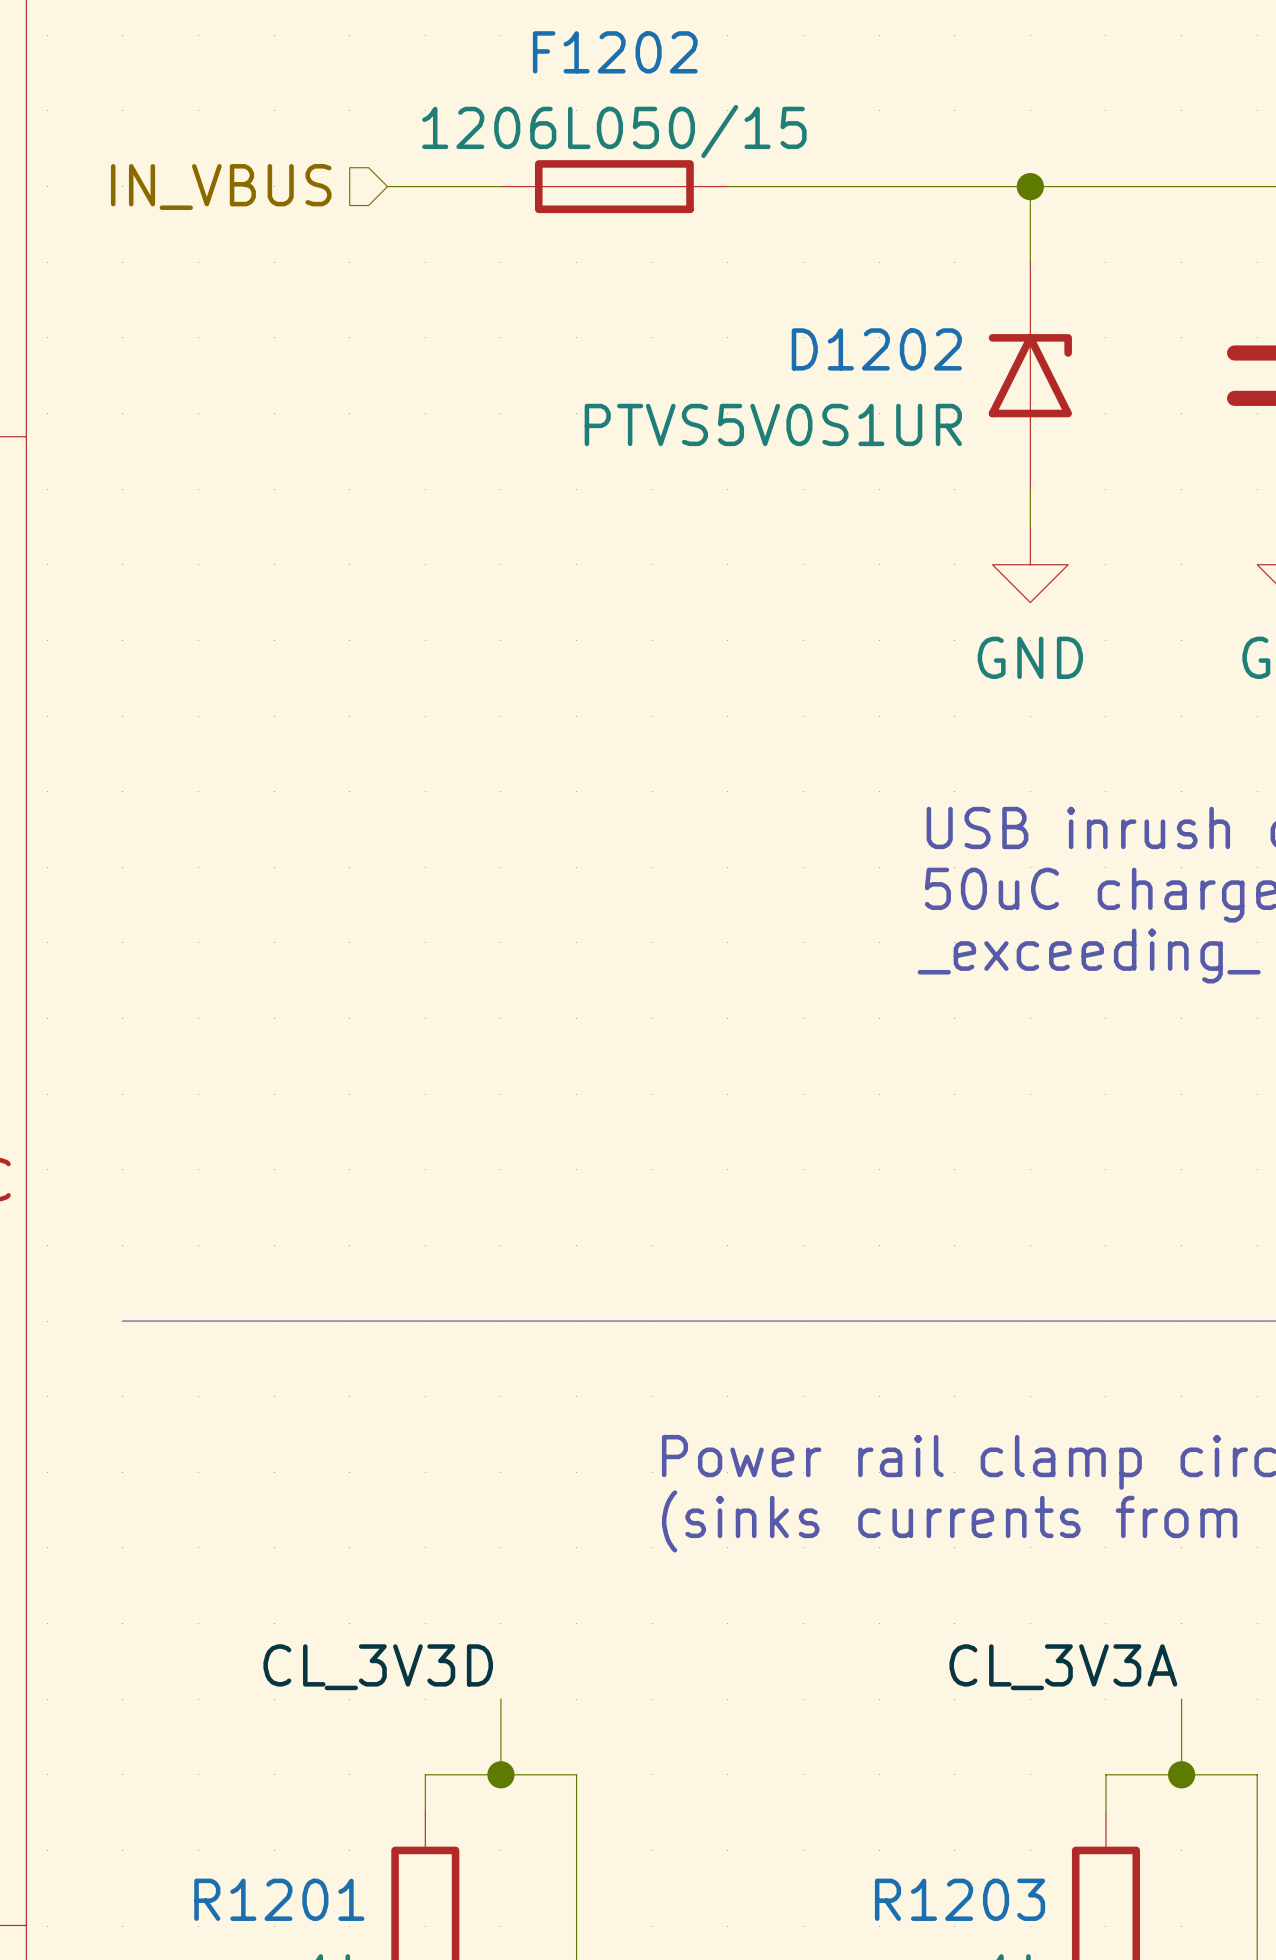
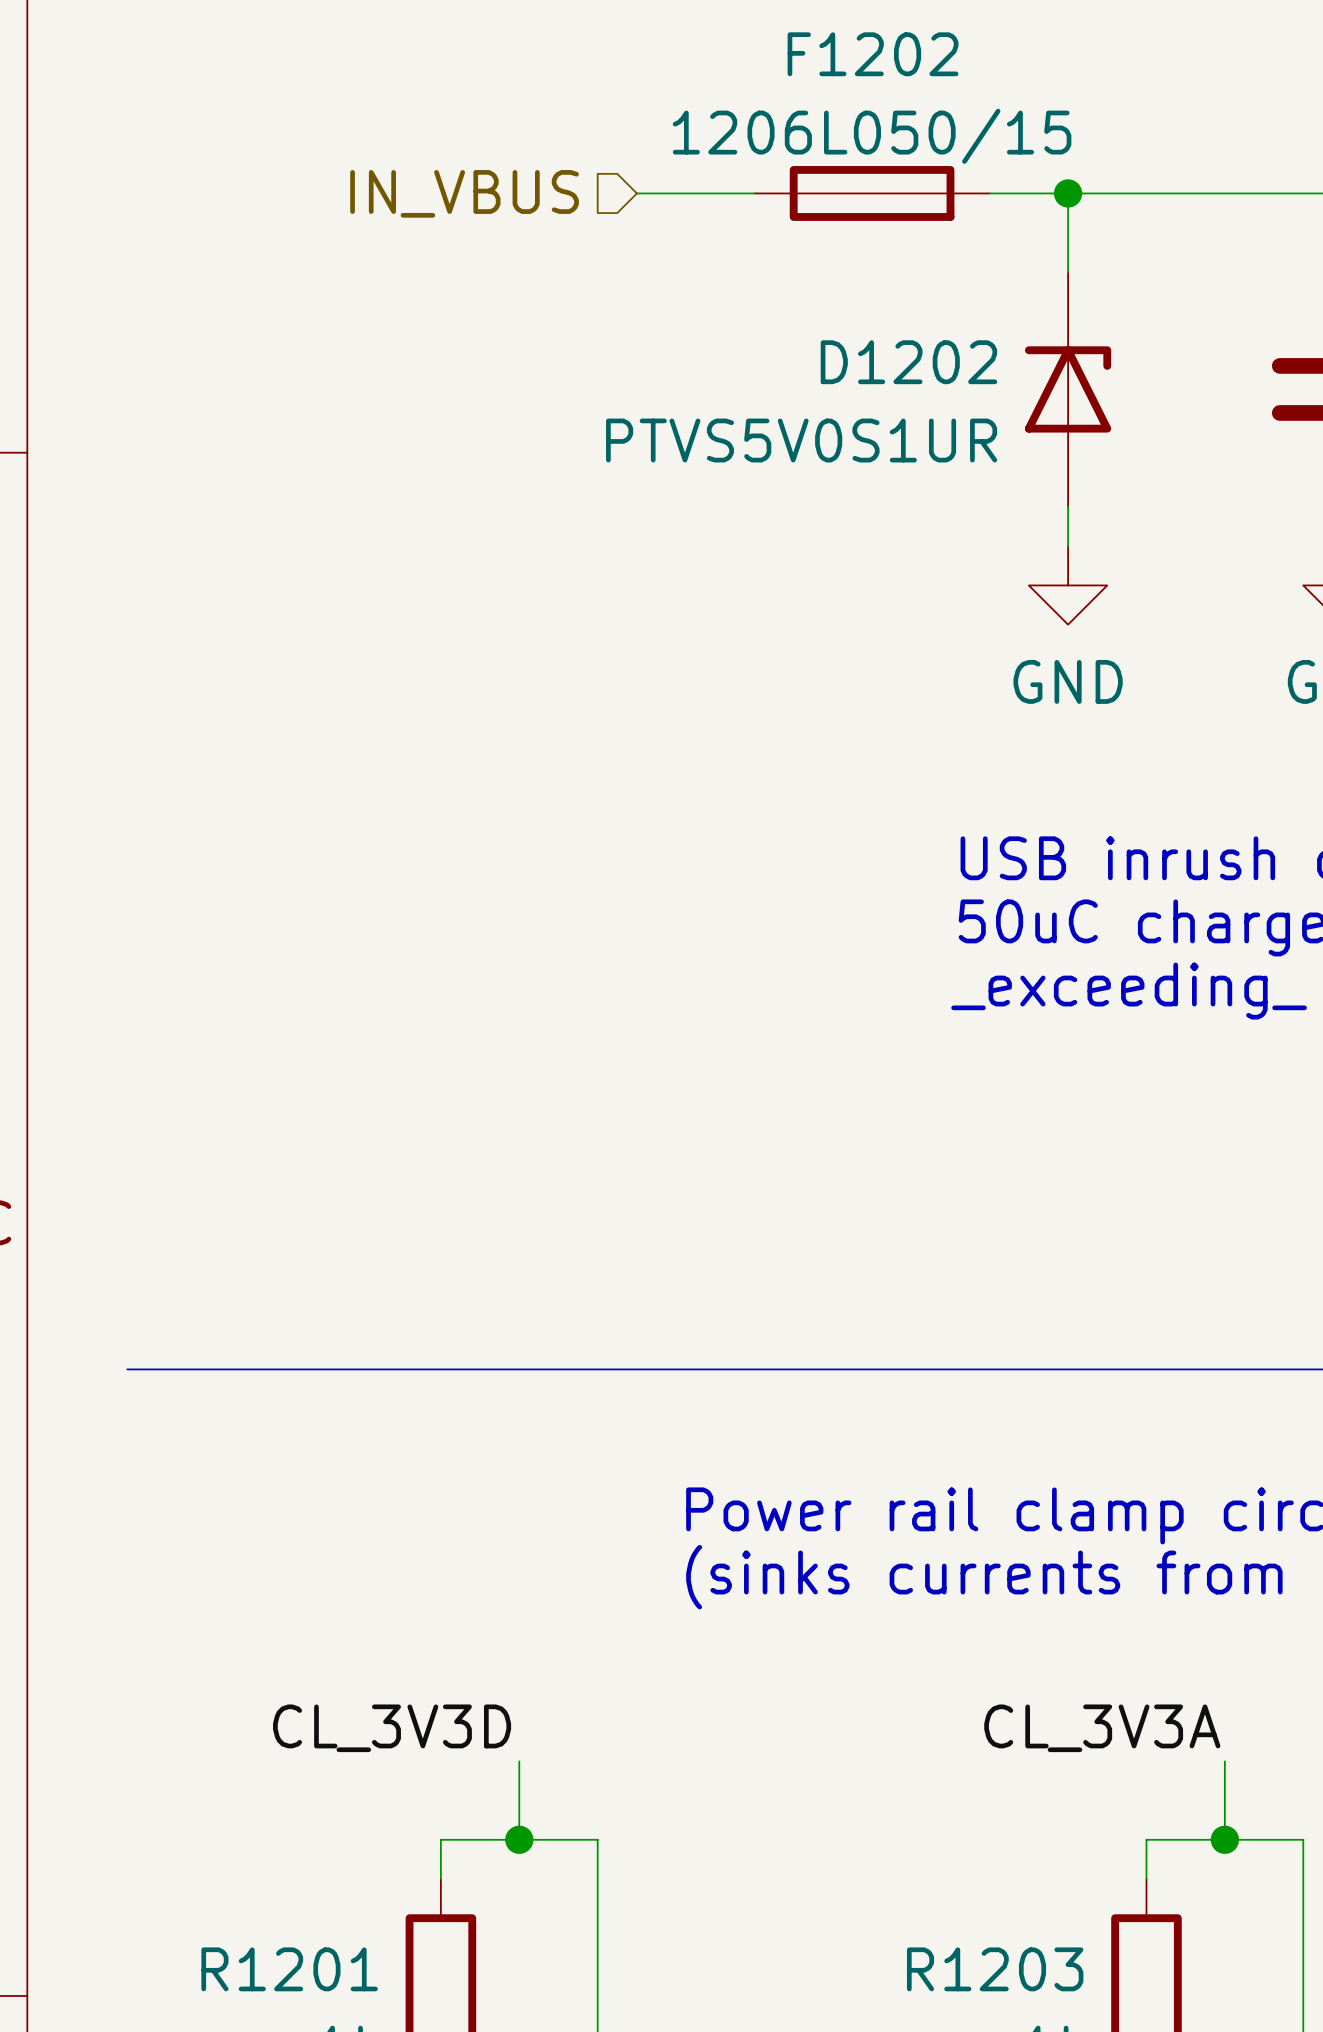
wire: (387, 186) (500, 186) -> none
F1202 position: (614, 186) -> (872, 193)
hierarchical label position: IN_VBUS (221, 187) -> IN_VBUS (464, 193)

